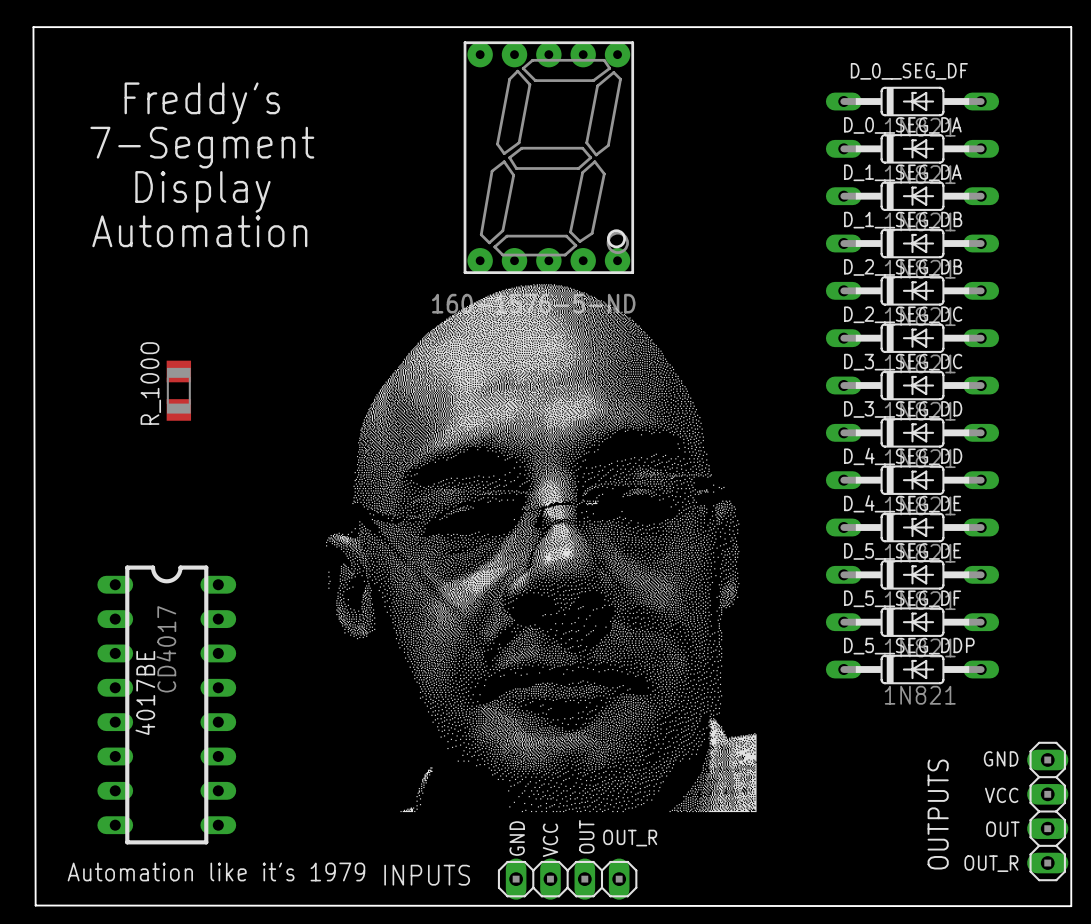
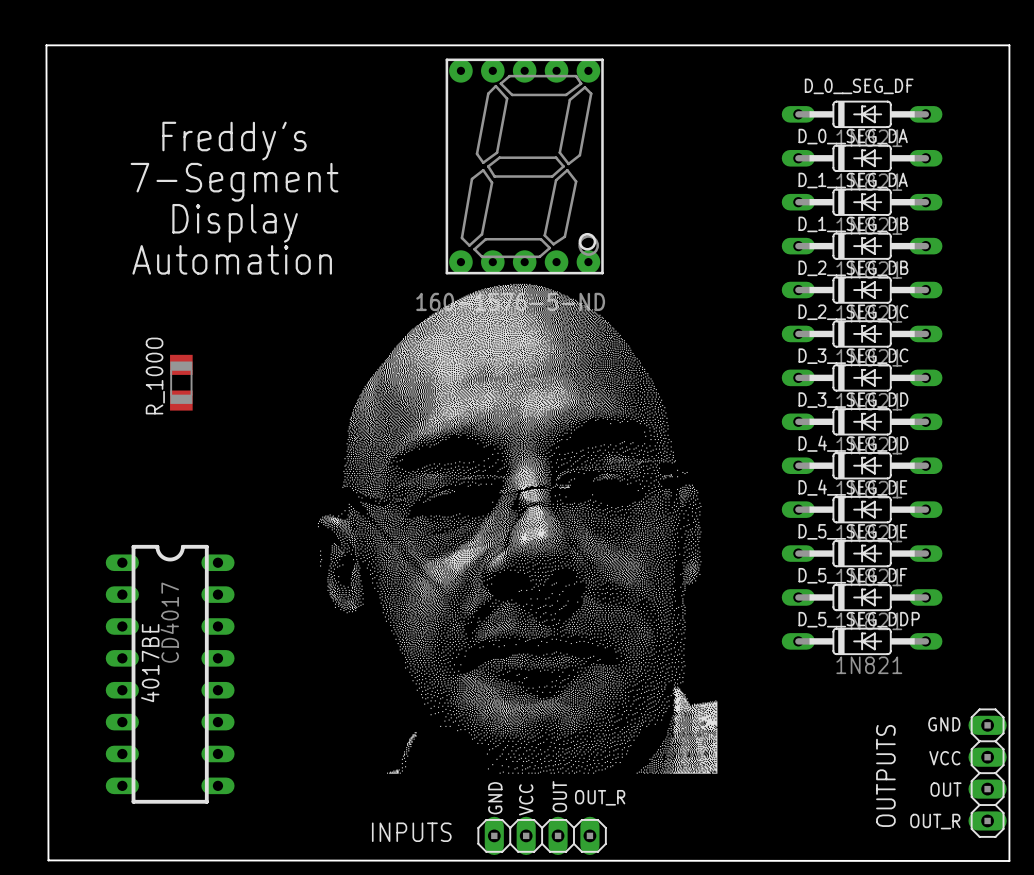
text position: Freddy's (202, 103) -> Freddy's (234, 141)
text position: 7-Segment (202, 147) -> 7-Segment (234, 182)
text position: Display (202, 191) -> Display (235, 223)
text position: Automation (199, 231) -> Automation (232, 259)
text: Automation like it's 1979 (216, 871) -> none

